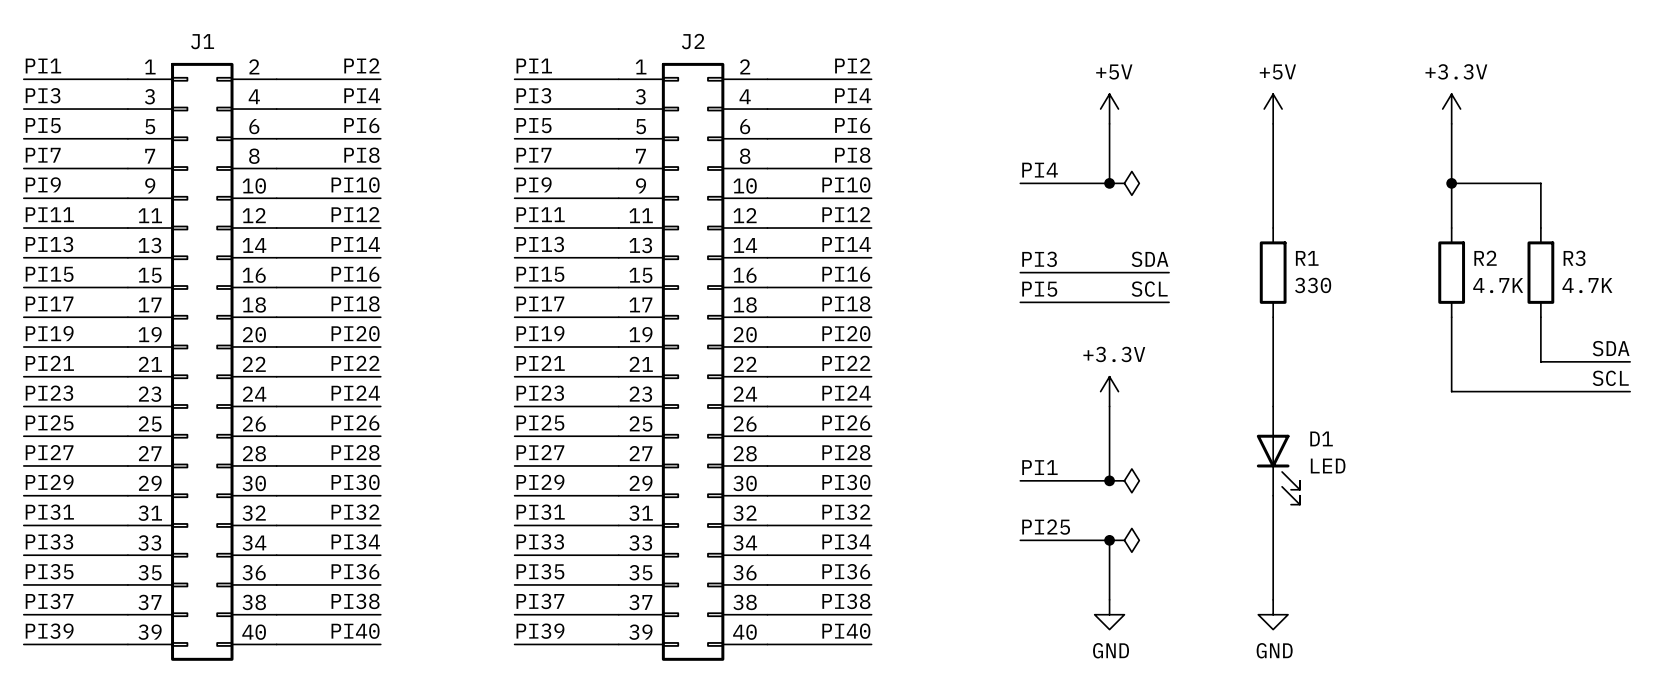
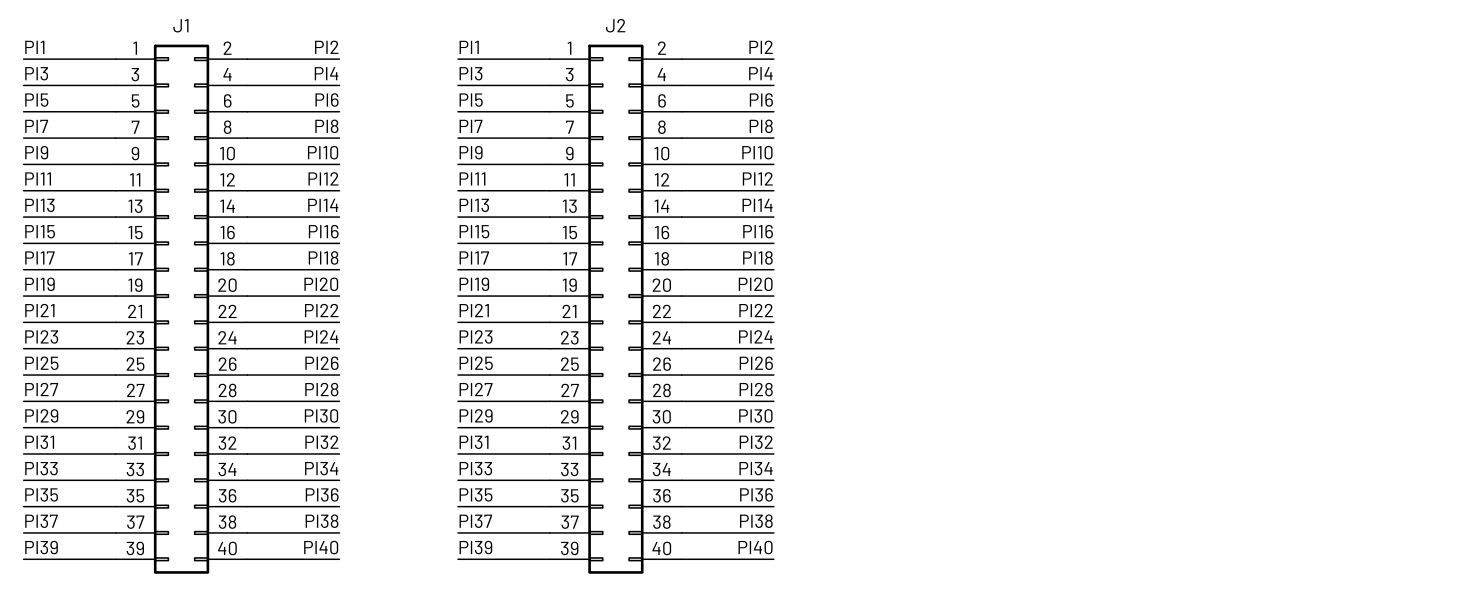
power symbol: +5V (1109, 109) -> none
power symbol: +5V (1273, 109) -> none
power symbol: +3.3V (1451, 109) -> none
wire: (1109, 123) (1109, 183) (1020, 183) -> none
wire: (1273, 123) (1273, 228) -> none
wire: (1451, 123) (1451, 228) -> none
label: PI4 (1040, 170) -> none
junction: (1109, 183) -> none
power symbol: (1124, 183) -> none
wire: (1451, 183) (1540, 183) (1540, 228) -> none
junction: (1451, 183) -> none
label: PI3 (1039, 259) -> none
label: SDA (1150, 259) -> none
wire: (1020, 272) (1169, 272) -> none
R1: 330 (1273, 272) -> none
R2: 4.7K (1451, 272) -> none
R3: 4.7K (1540, 272) -> none
label: PI5 (1039, 289) -> none
label: SCL (1149, 289) -> none
wire: (1020, 302) (1169, 302) -> none
wire: (1273, 317) (1273, 406) -> none
wire: (1451, 317) (1451, 391) (1630, 391) -> none
wire: (1540, 317) (1540, 361) (1630, 361) -> none
label: SDA (1611, 348) -> none
label: SCL (1610, 378) -> none
power symbol: +3.3V (1109, 391) -> none
wire: (1109, 406) (1109, 480) (1020, 480) -> none
D1: LED (1278, 455) -> none
label: PI1 (1039, 467) -> none
junction: (1109, 480) -> none
power symbol: (1124, 480) -> none
wire: (1273, 495) (1273, 599) -> none
label: PI25 (1046, 527) -> none
wire: (1020, 540) (1109, 540) (1109, 599) -> none
junction: (1109, 540) -> none
power symbol: (1124, 540) -> none
power symbol: GND (1109, 614) -> none
power symbol: GND (1273, 614) -> none

